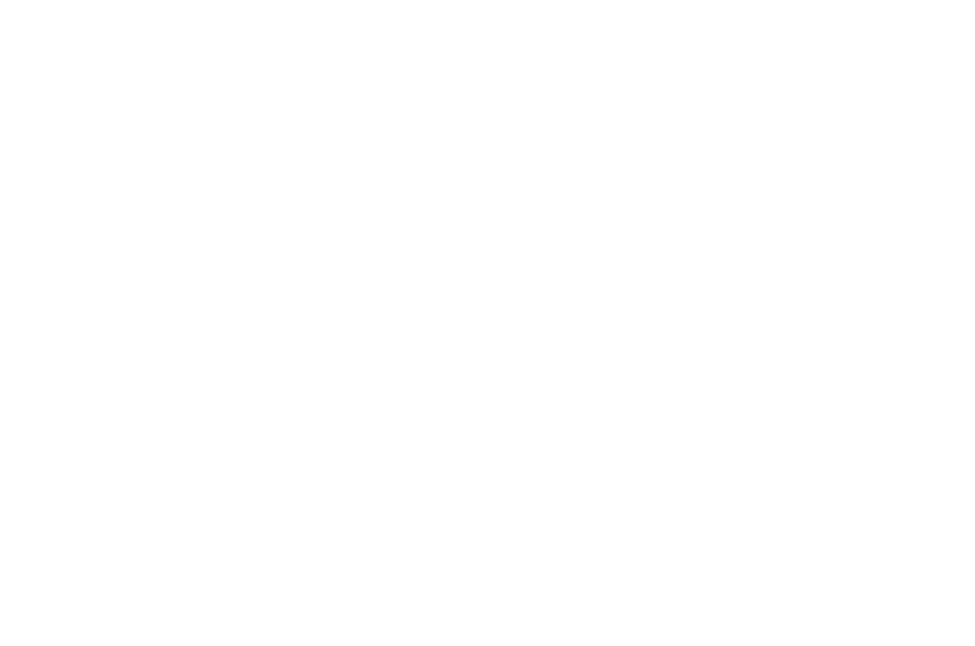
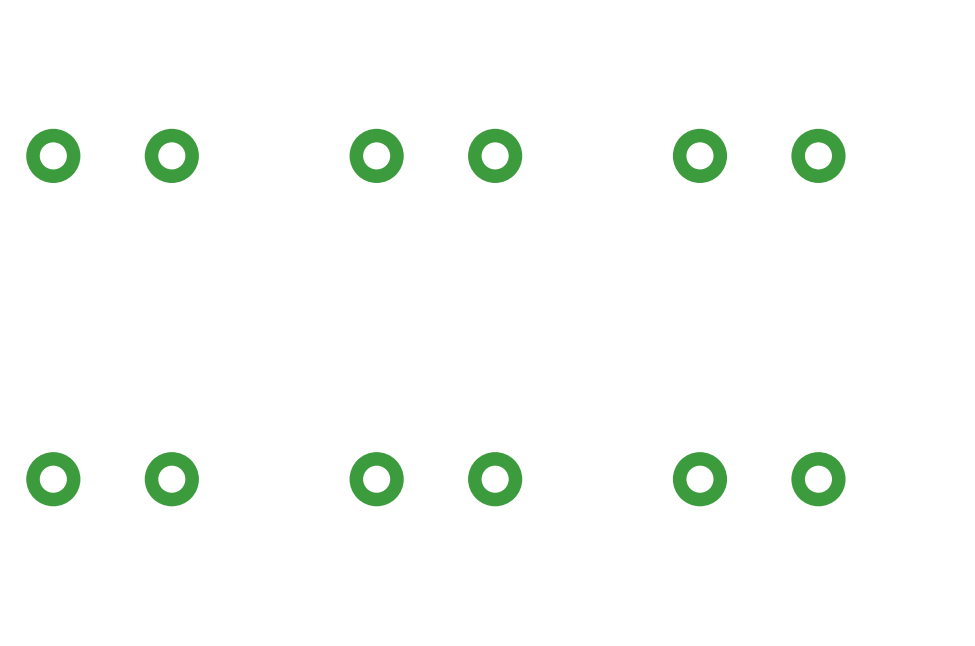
part: none -> (112, 155)
part: none -> (435, 155)
part: none -> (759, 155)
part: none -> (112, 479)
part: none -> (435, 479)
part: none -> (759, 479)

